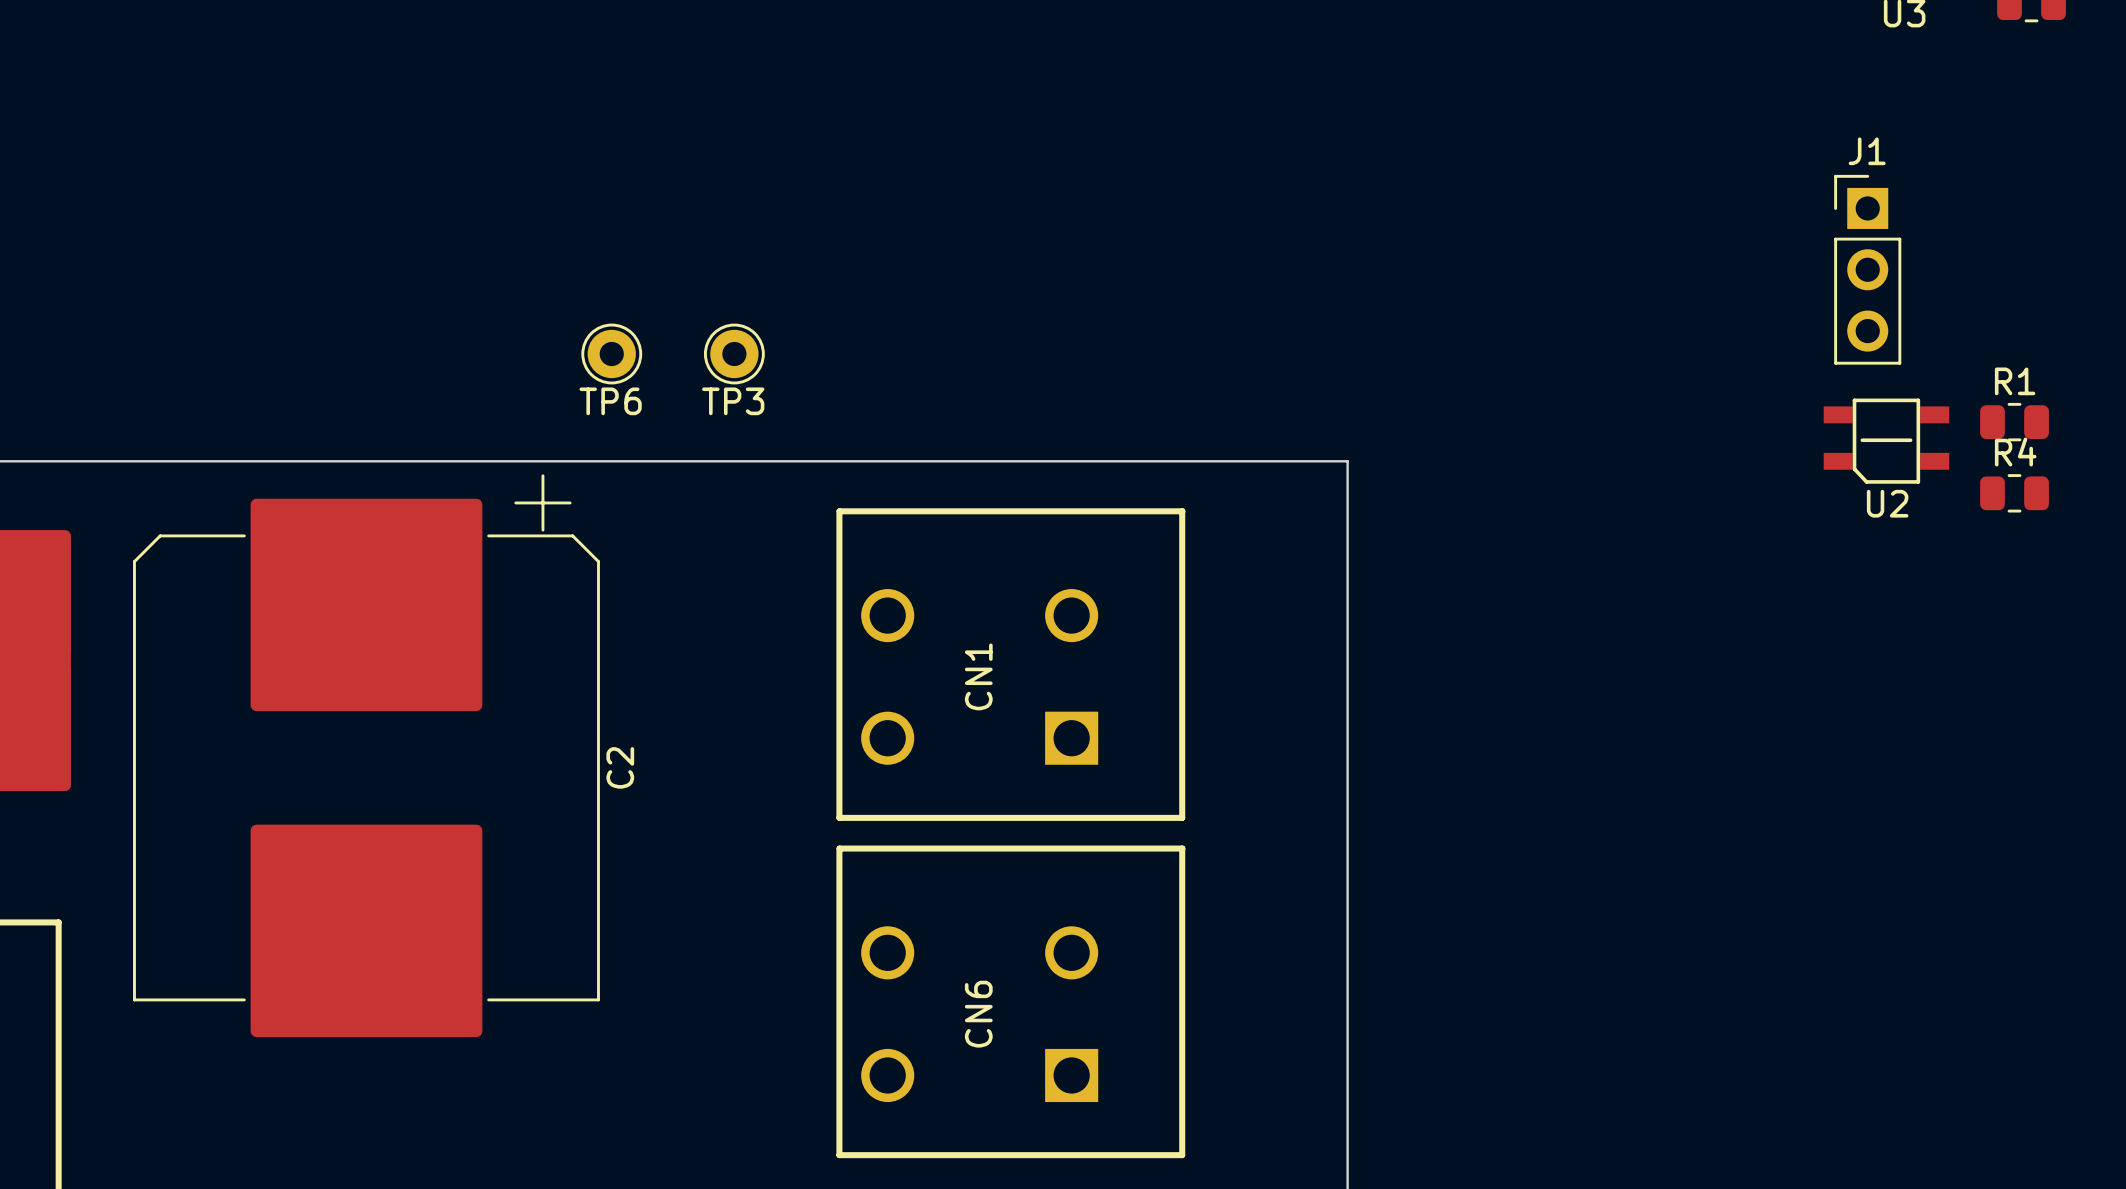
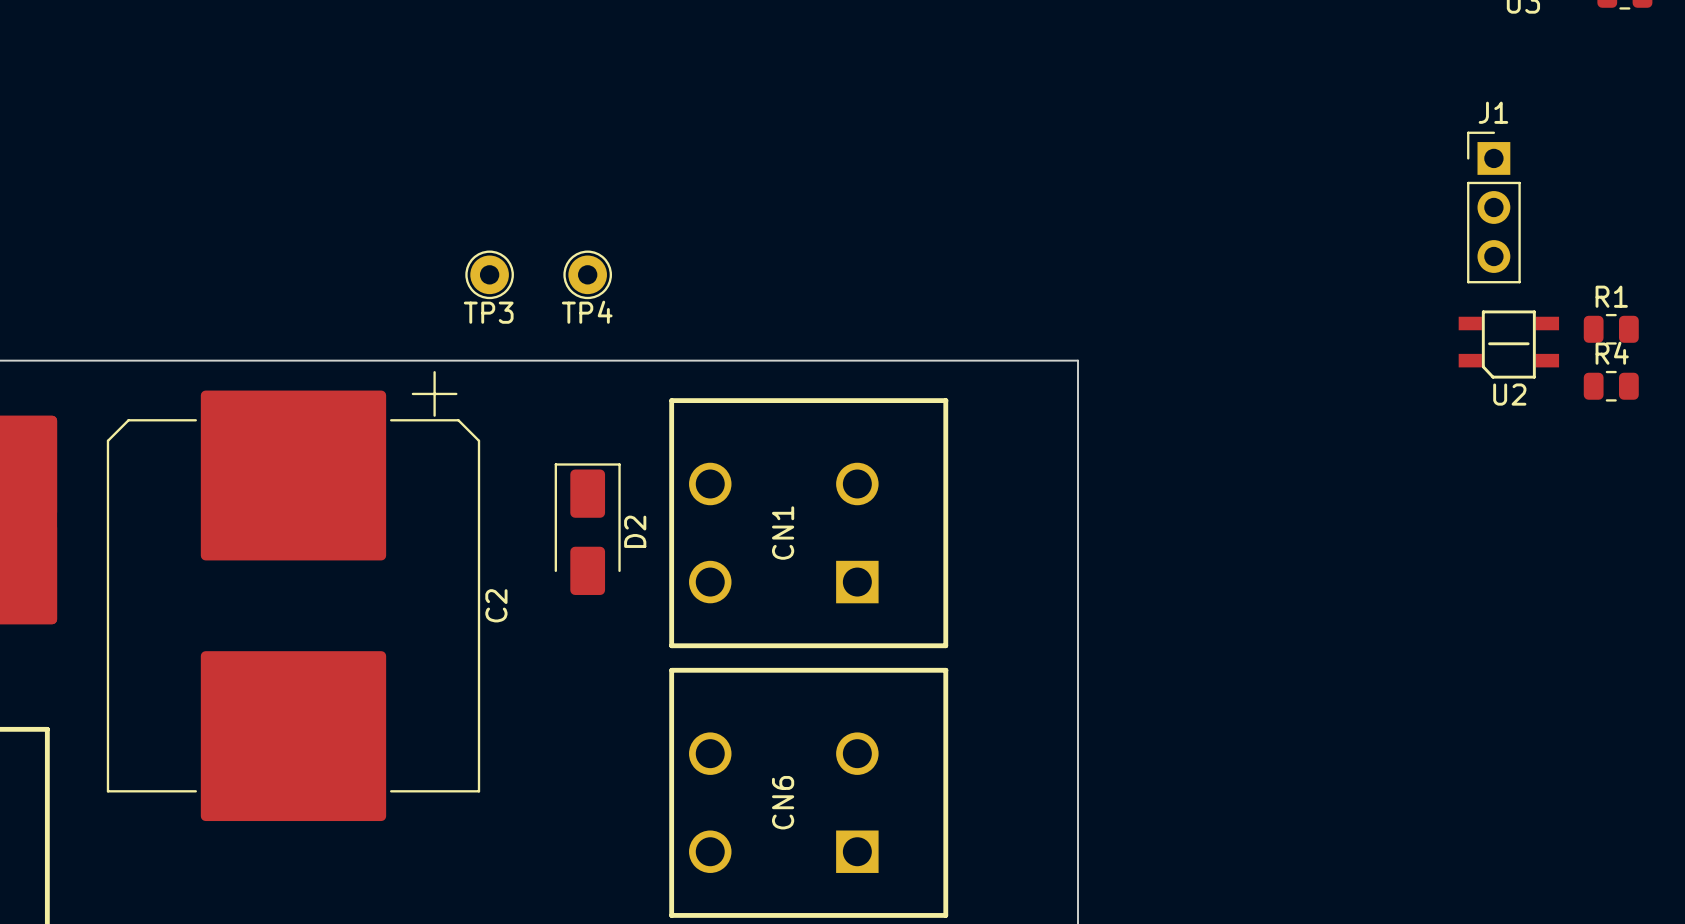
TP6 name: TP6 (610, 401) -> TP3 (488, 312)
TP3 name: TP3 (733, 401) -> TP4 (587, 312)
D2: none -> (587, 529)

